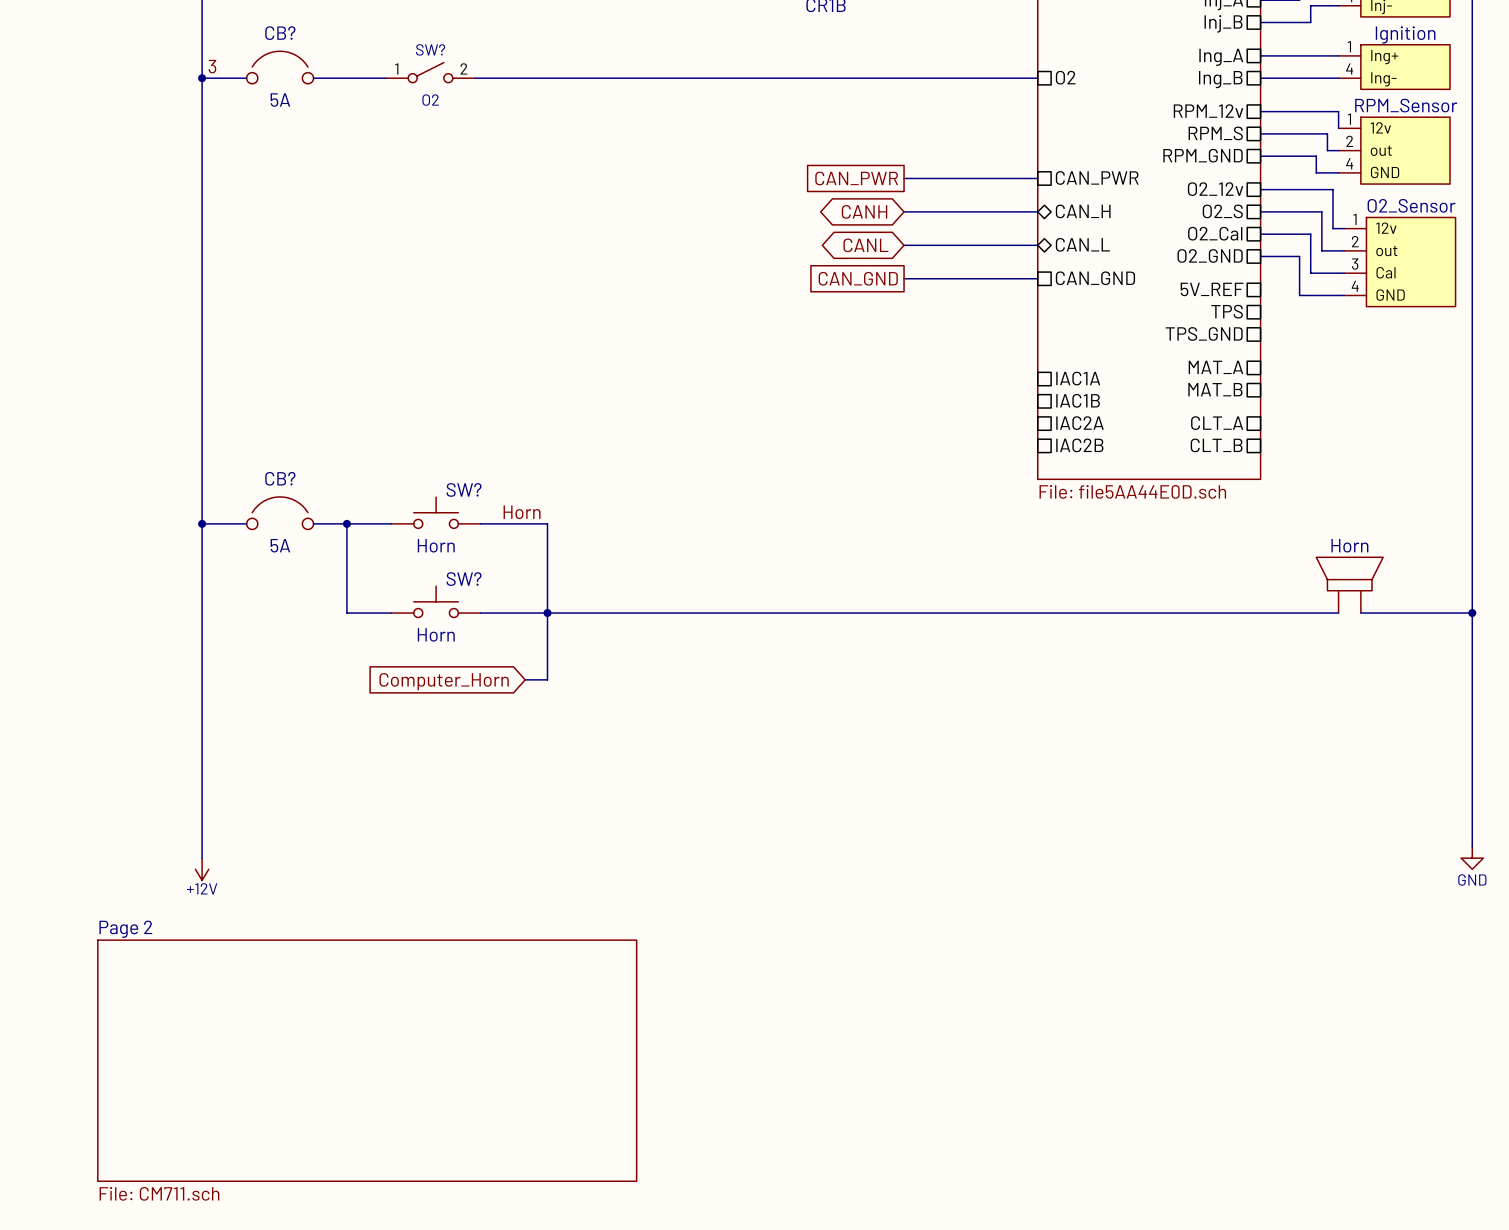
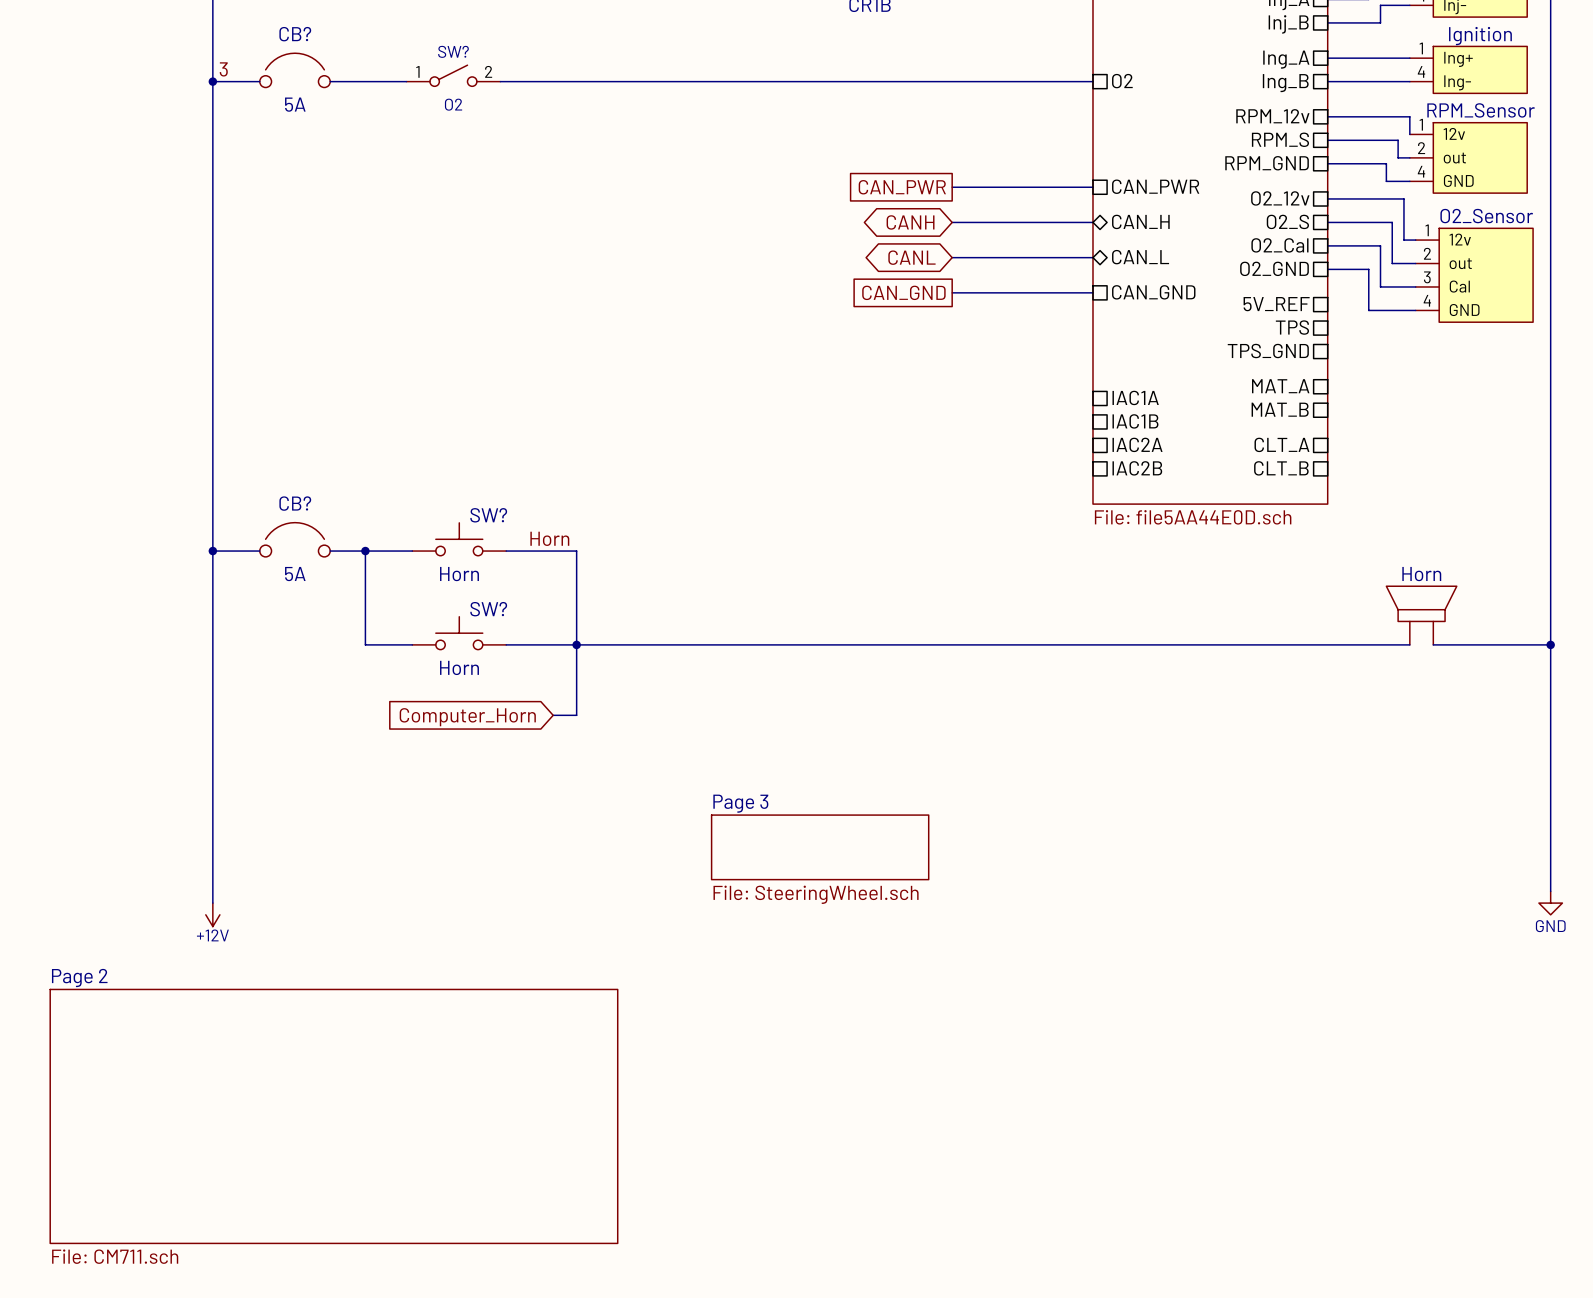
sheet Page 3: none -> File: SteeringWheel.sch (820, 847)
sheet Page 2 position: (367, 1060) -> (333, 1116)

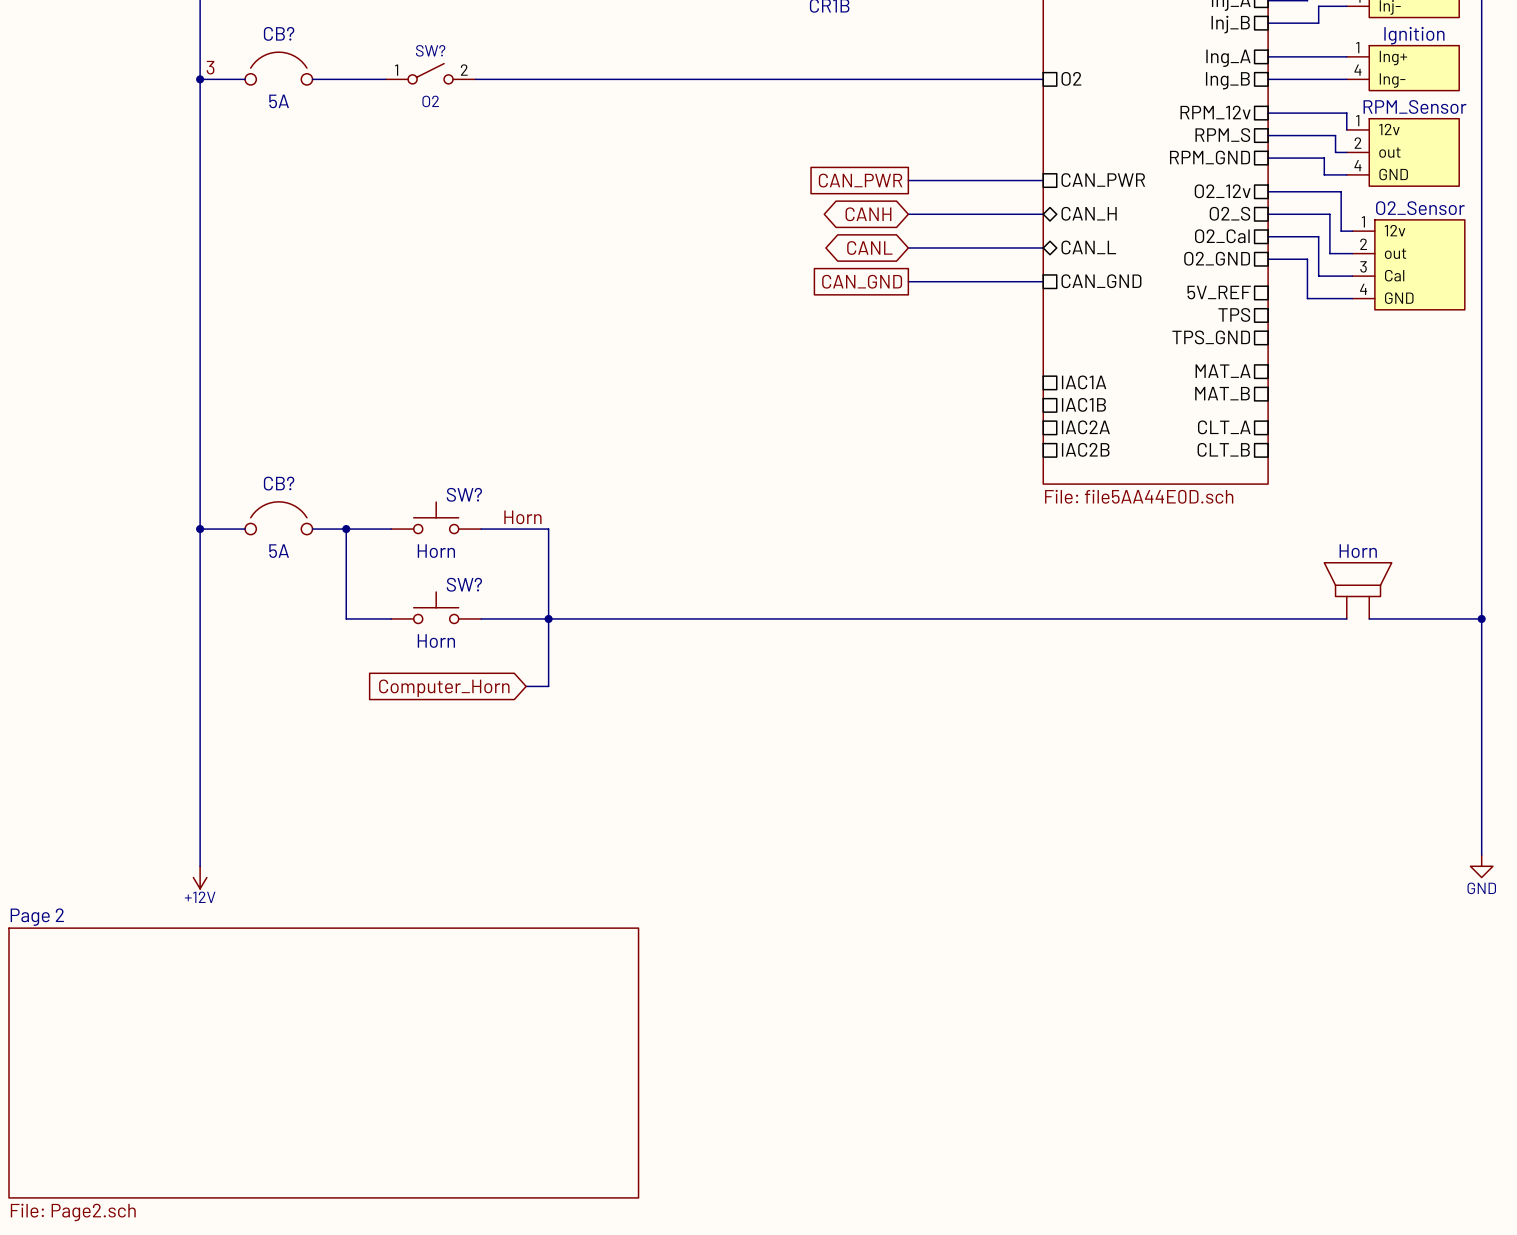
sheet Page 3: File: SteeringWheel.sch (820, 847) -> none
sheet Page 2 name position: Page 2 (79, 978) -> Page 2 (37, 917)
sheet Page 2 shape: [50, 989, 618, 1244] -> [9, 928, 639, 1198]
sheet Page 2 value: File: CM711.sch (115, 1256) -> File: Page2.sch (73, 1212)

